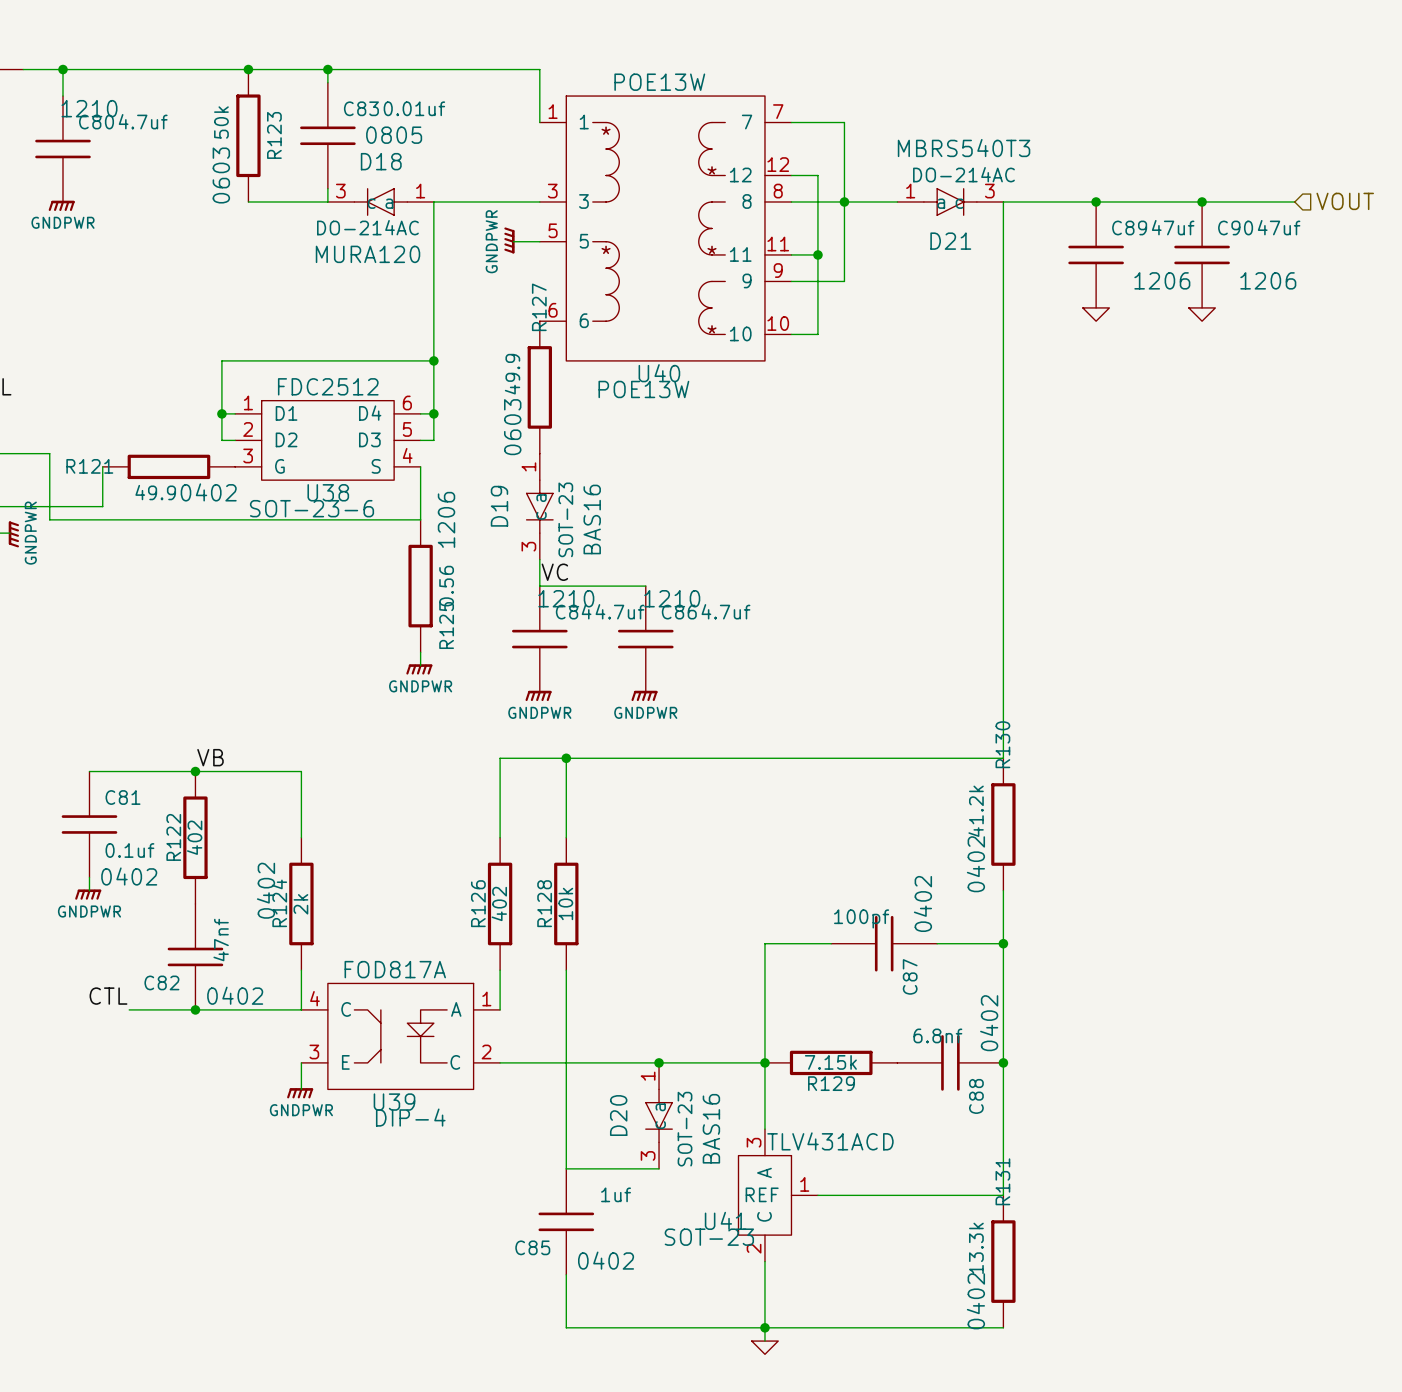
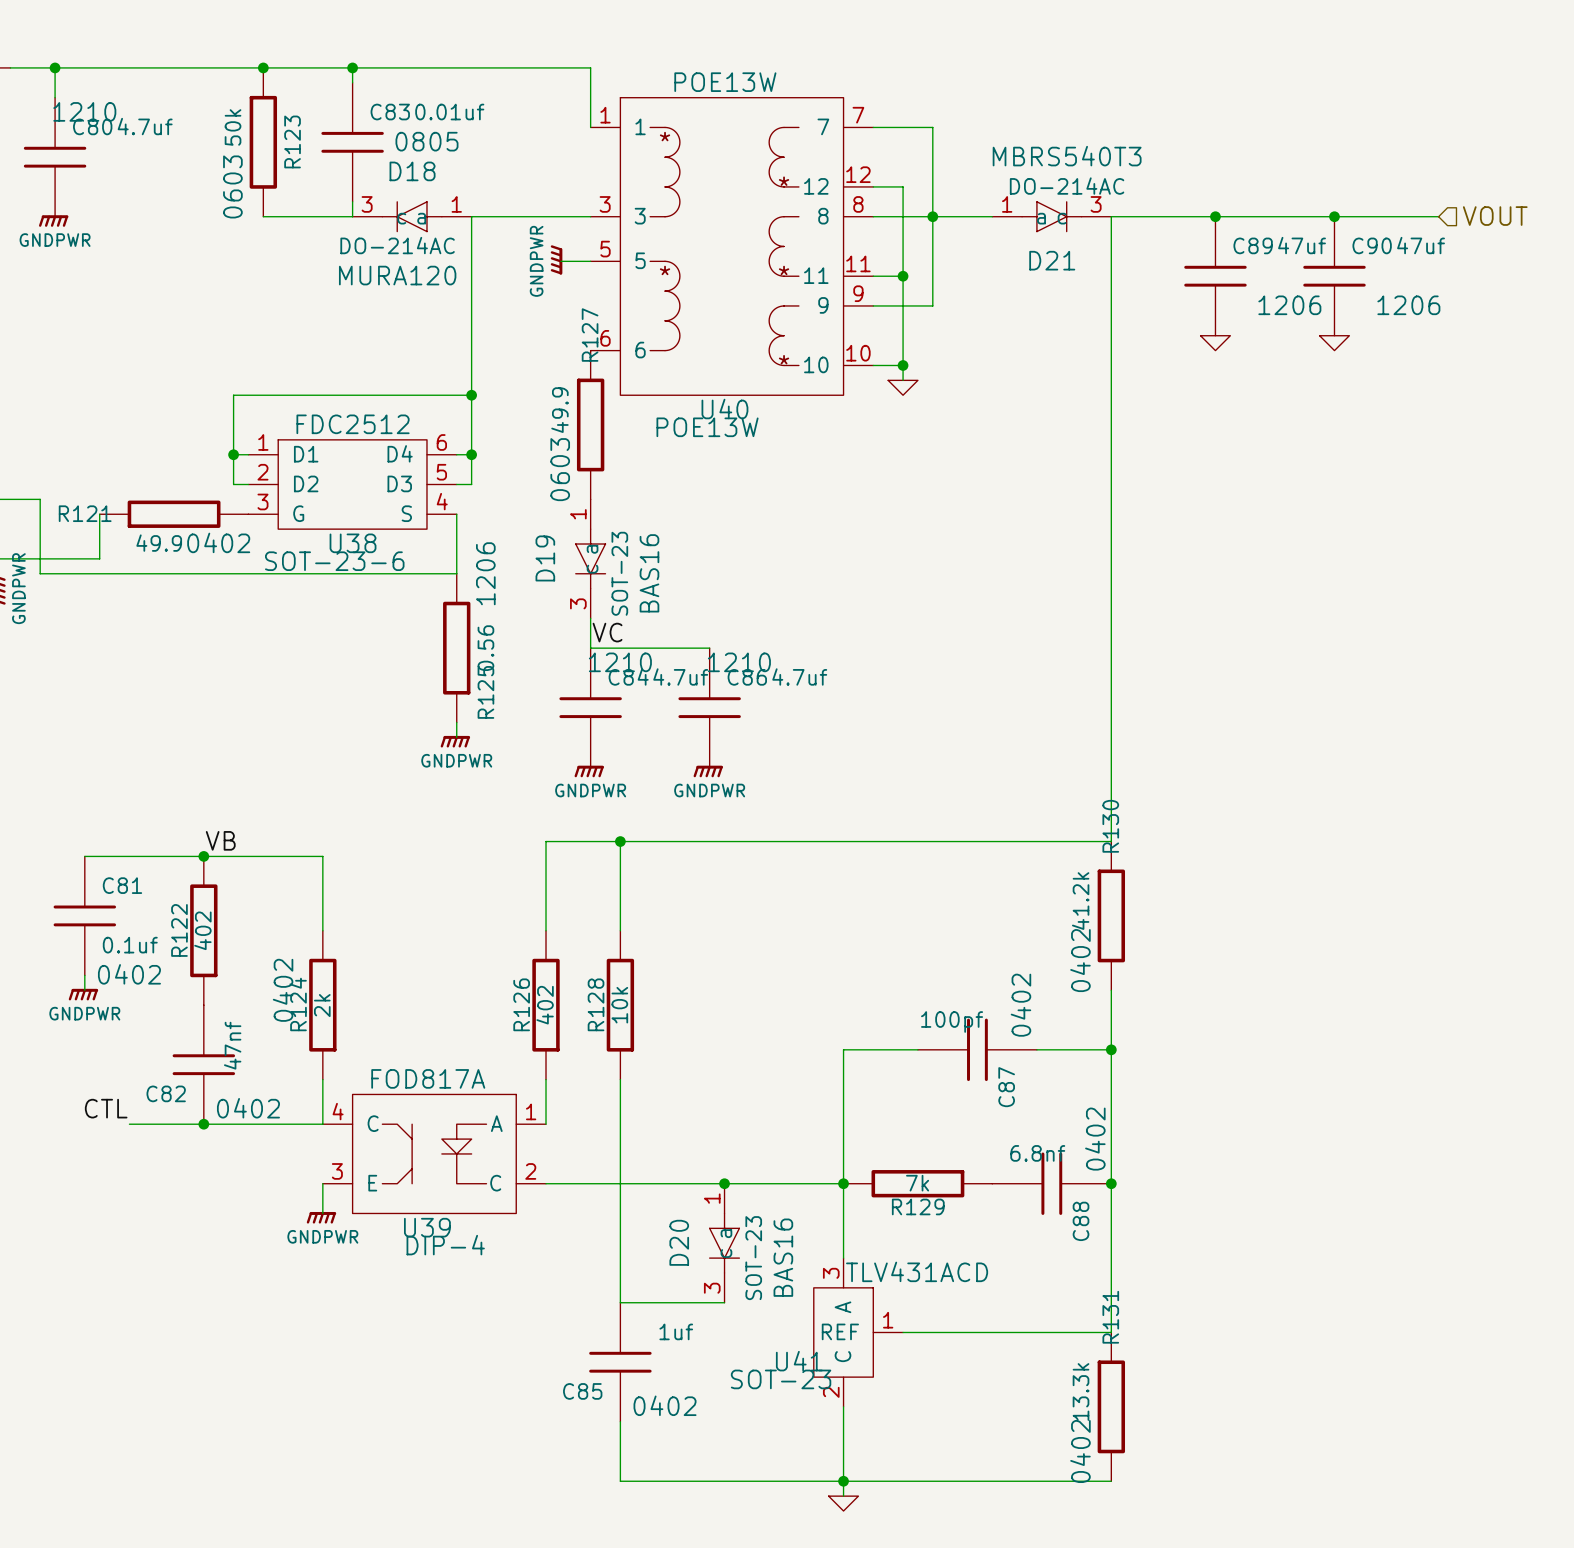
wire: none -> (903, 365) (903, 380)
junction: none -> (903, 365)
power symbol: none -> (903, 387)
R129 value: 7.15k (830, 1062) -> 7k (917, 1183)

